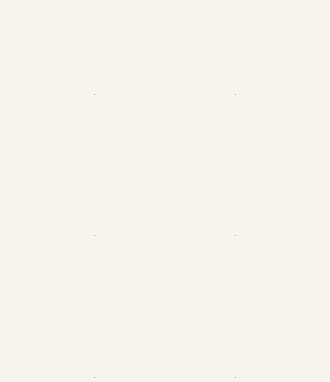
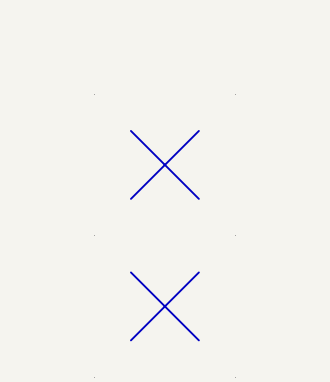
no-connect mark: none -> (164, 164)
no-connect mark: none -> (164, 306)

